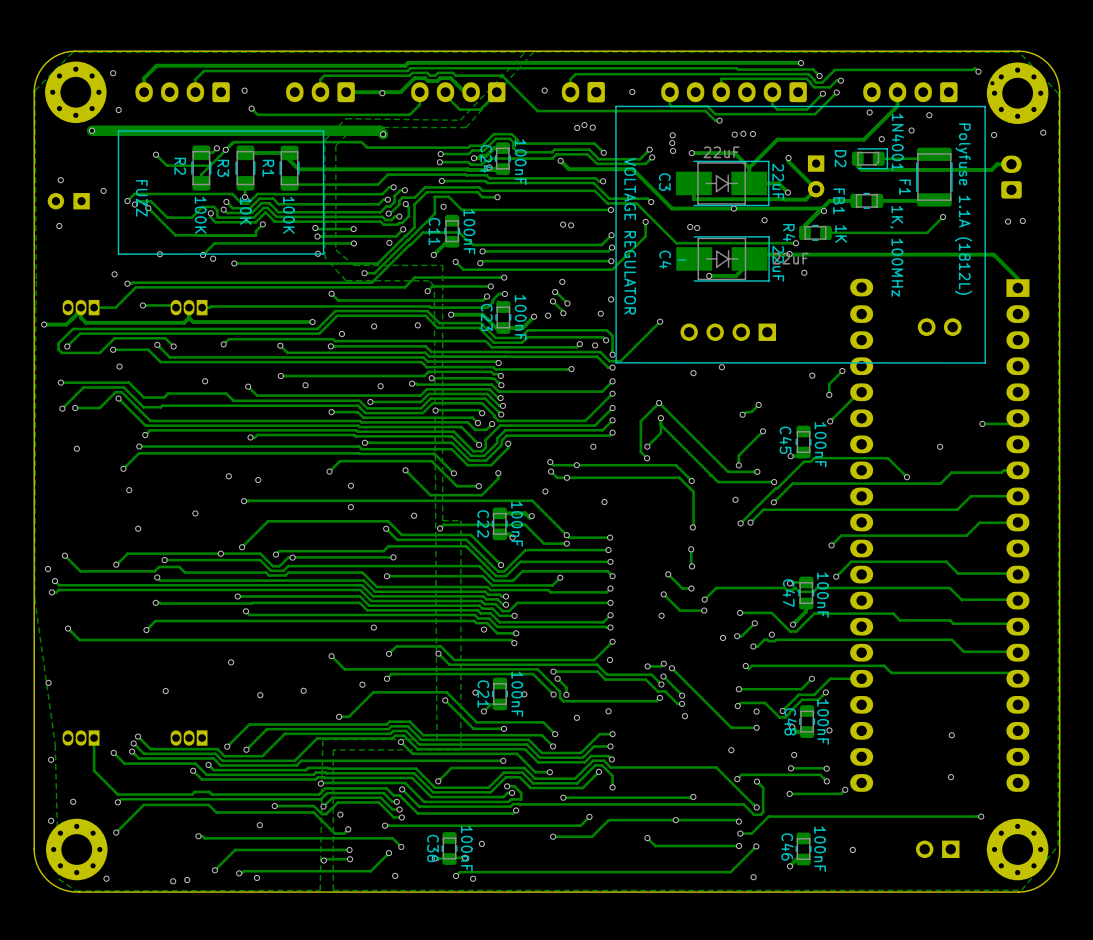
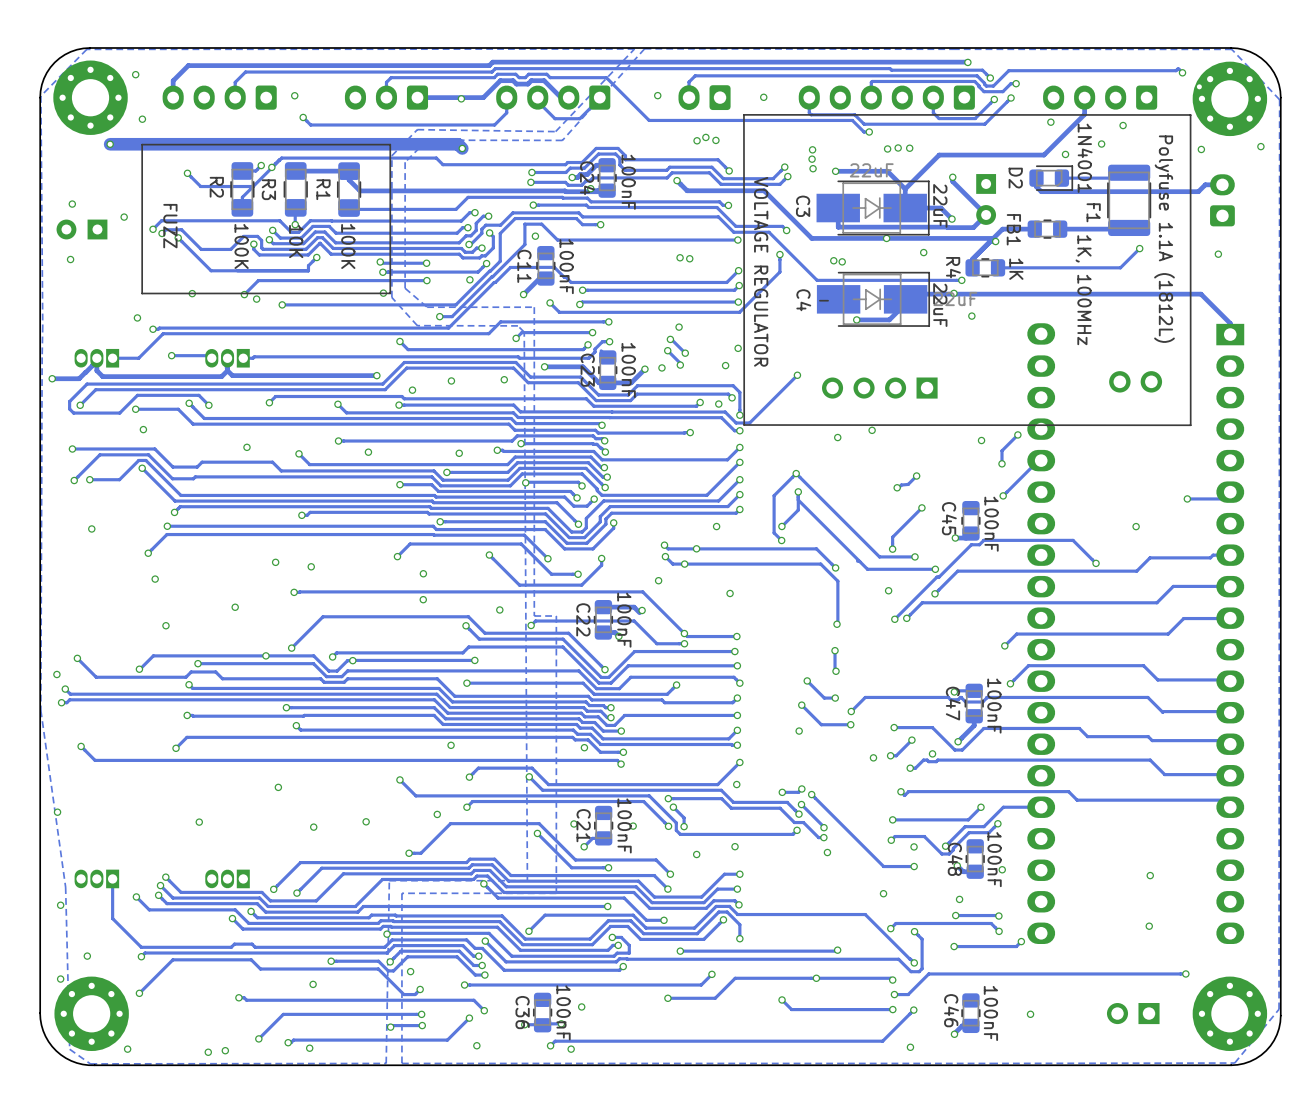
via: (1022, 220) -> none

